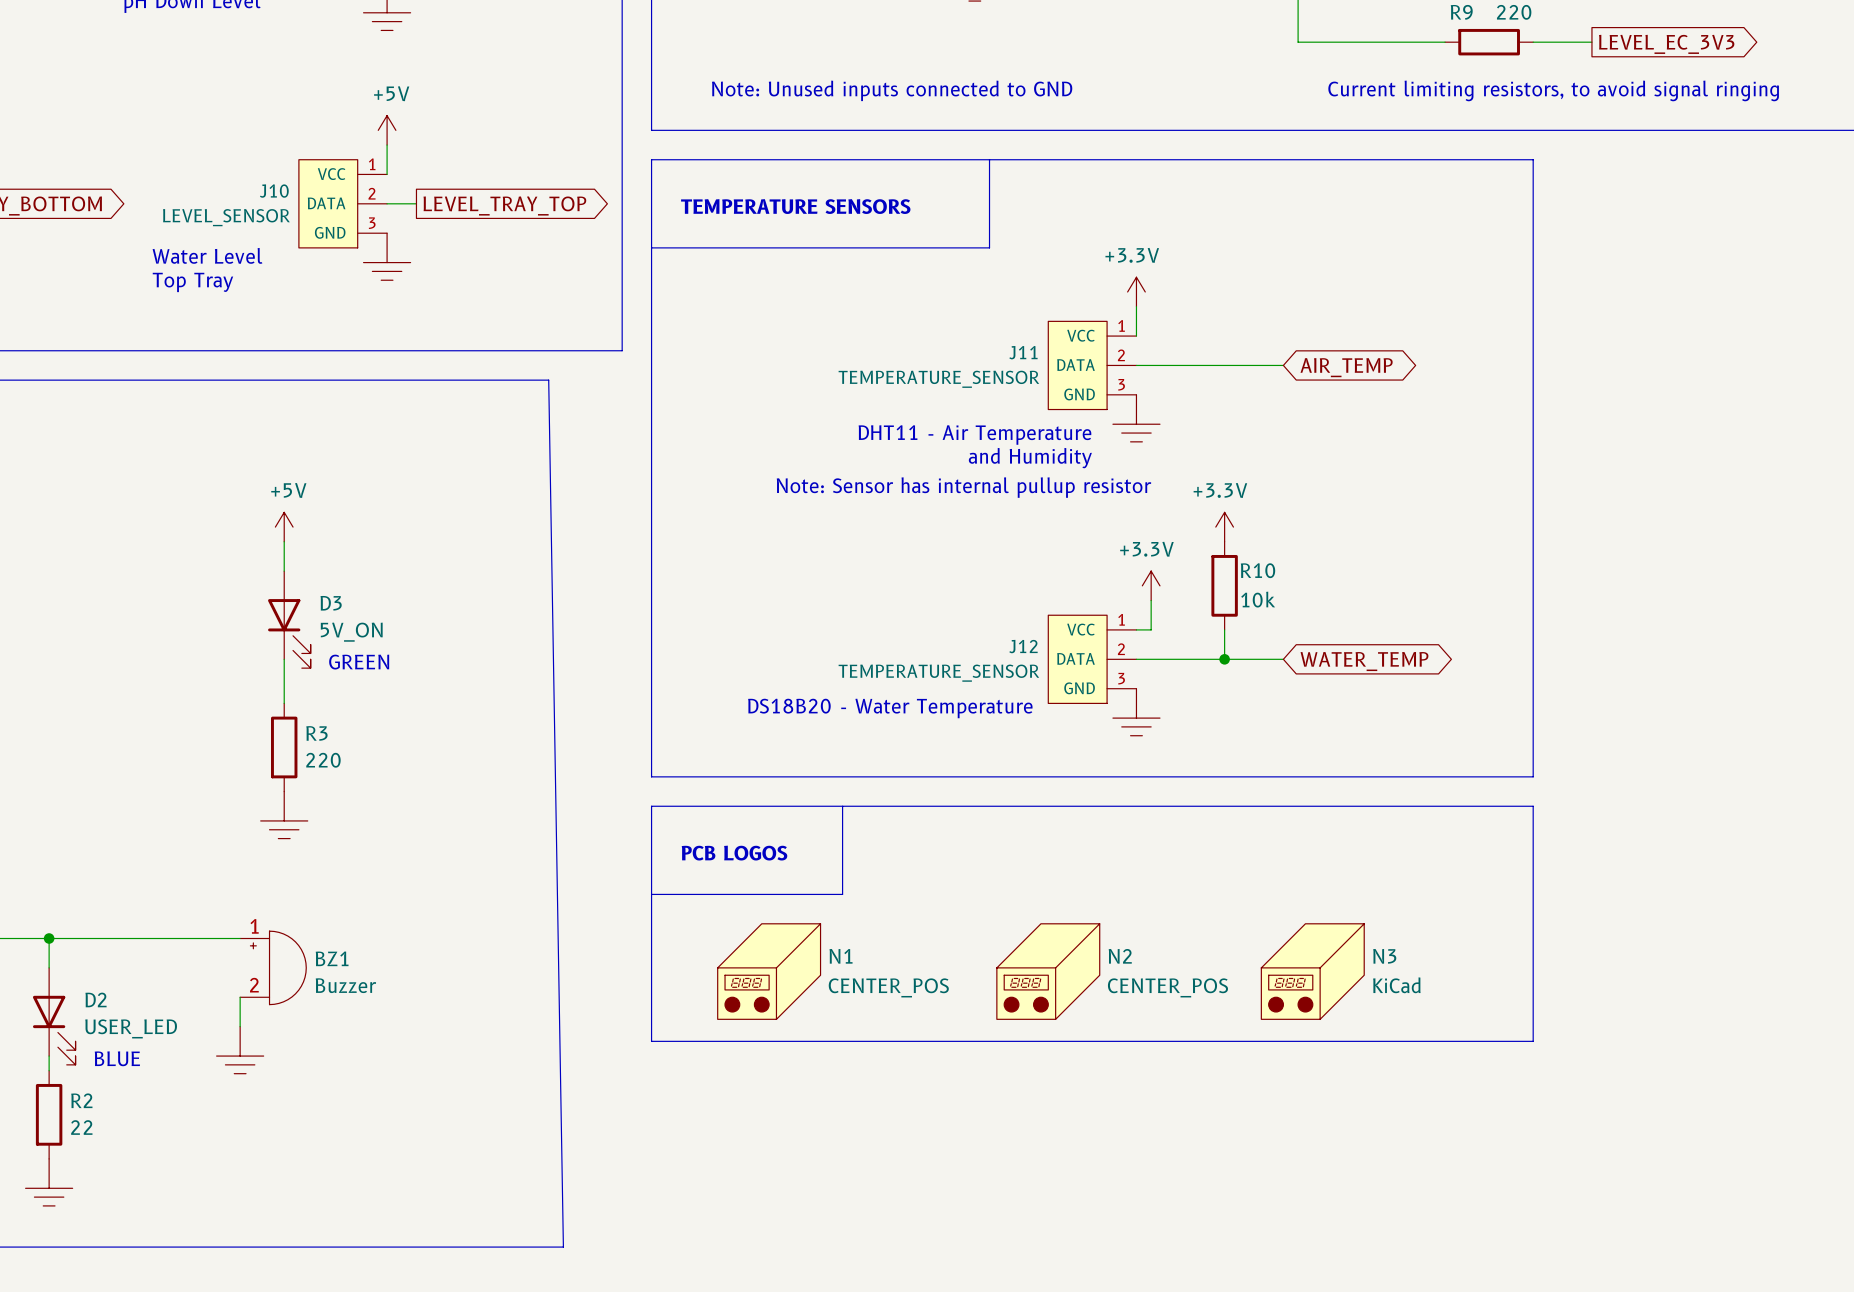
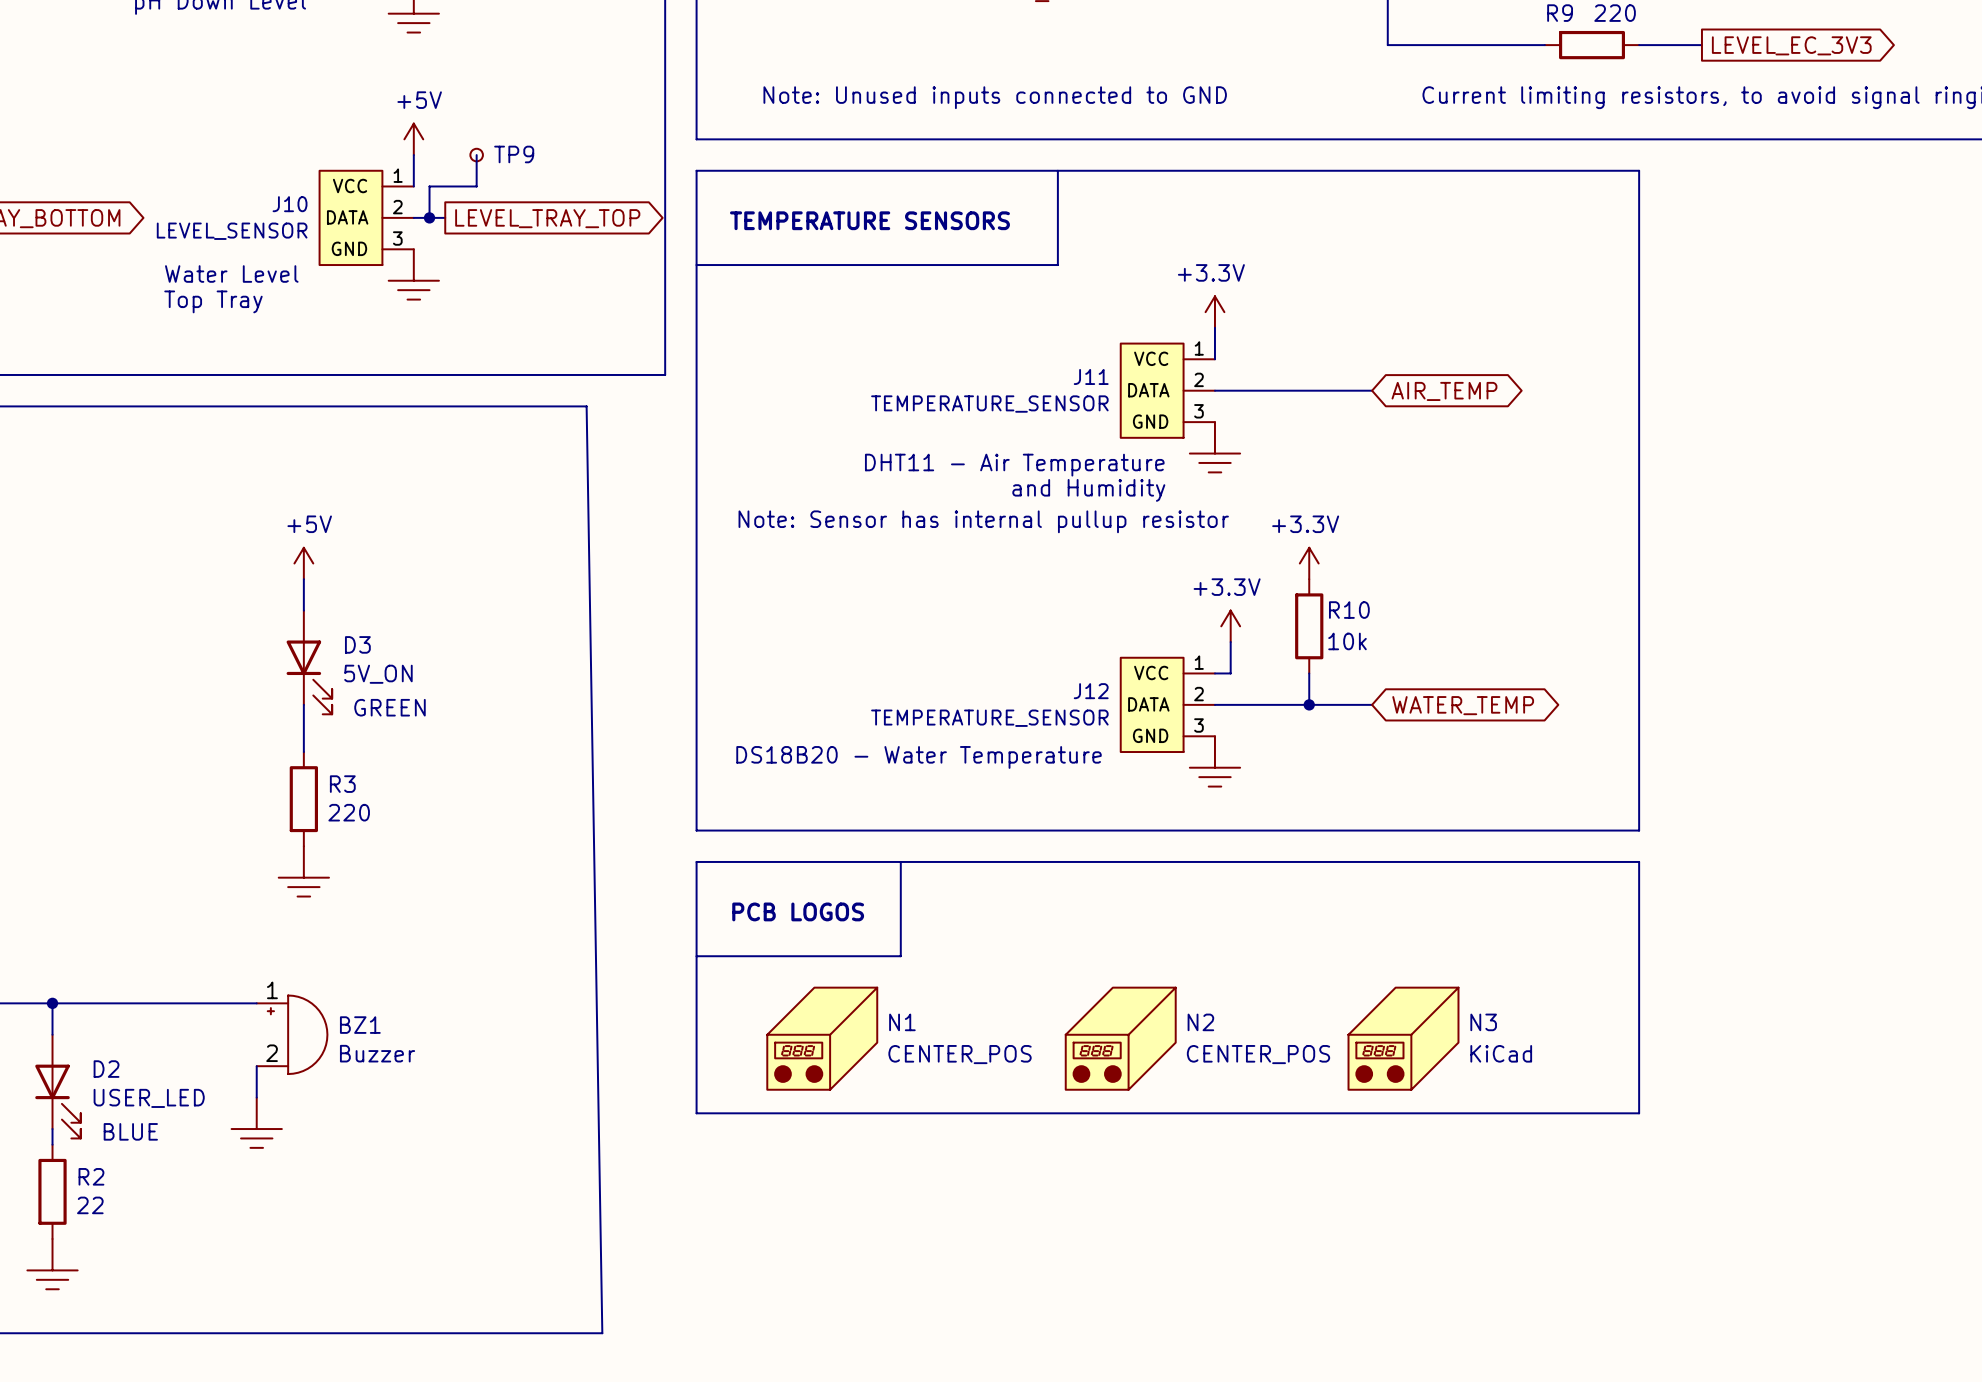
wire: none -> (476, 155) (476, 186) (429, 186) (429, 217)
TP9: none -> (476, 155)
junction: none -> (429, 217)

